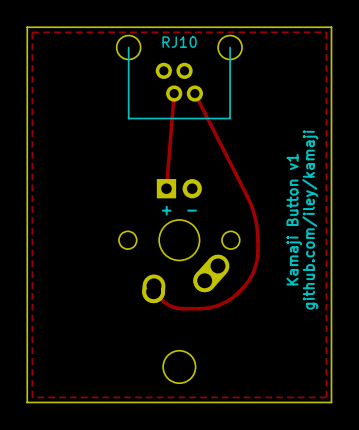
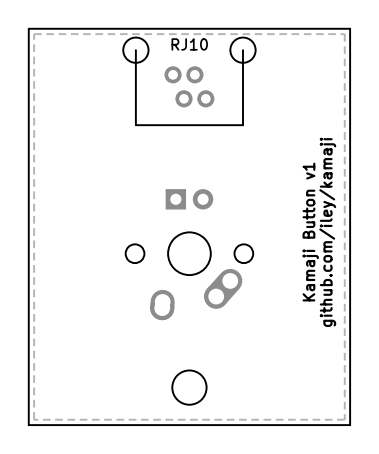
track: (174, 93) (166, 188) -> none
track: (194, 93) (250, 203) (257, 233) (256, 261) (251, 276) (241, 289) (230, 299) (215, 306) (199, 308) (175, 307) (164, 302) (153, 291) -> none
text: + (166, 210) -> none
text: - (192, 210) -> none

